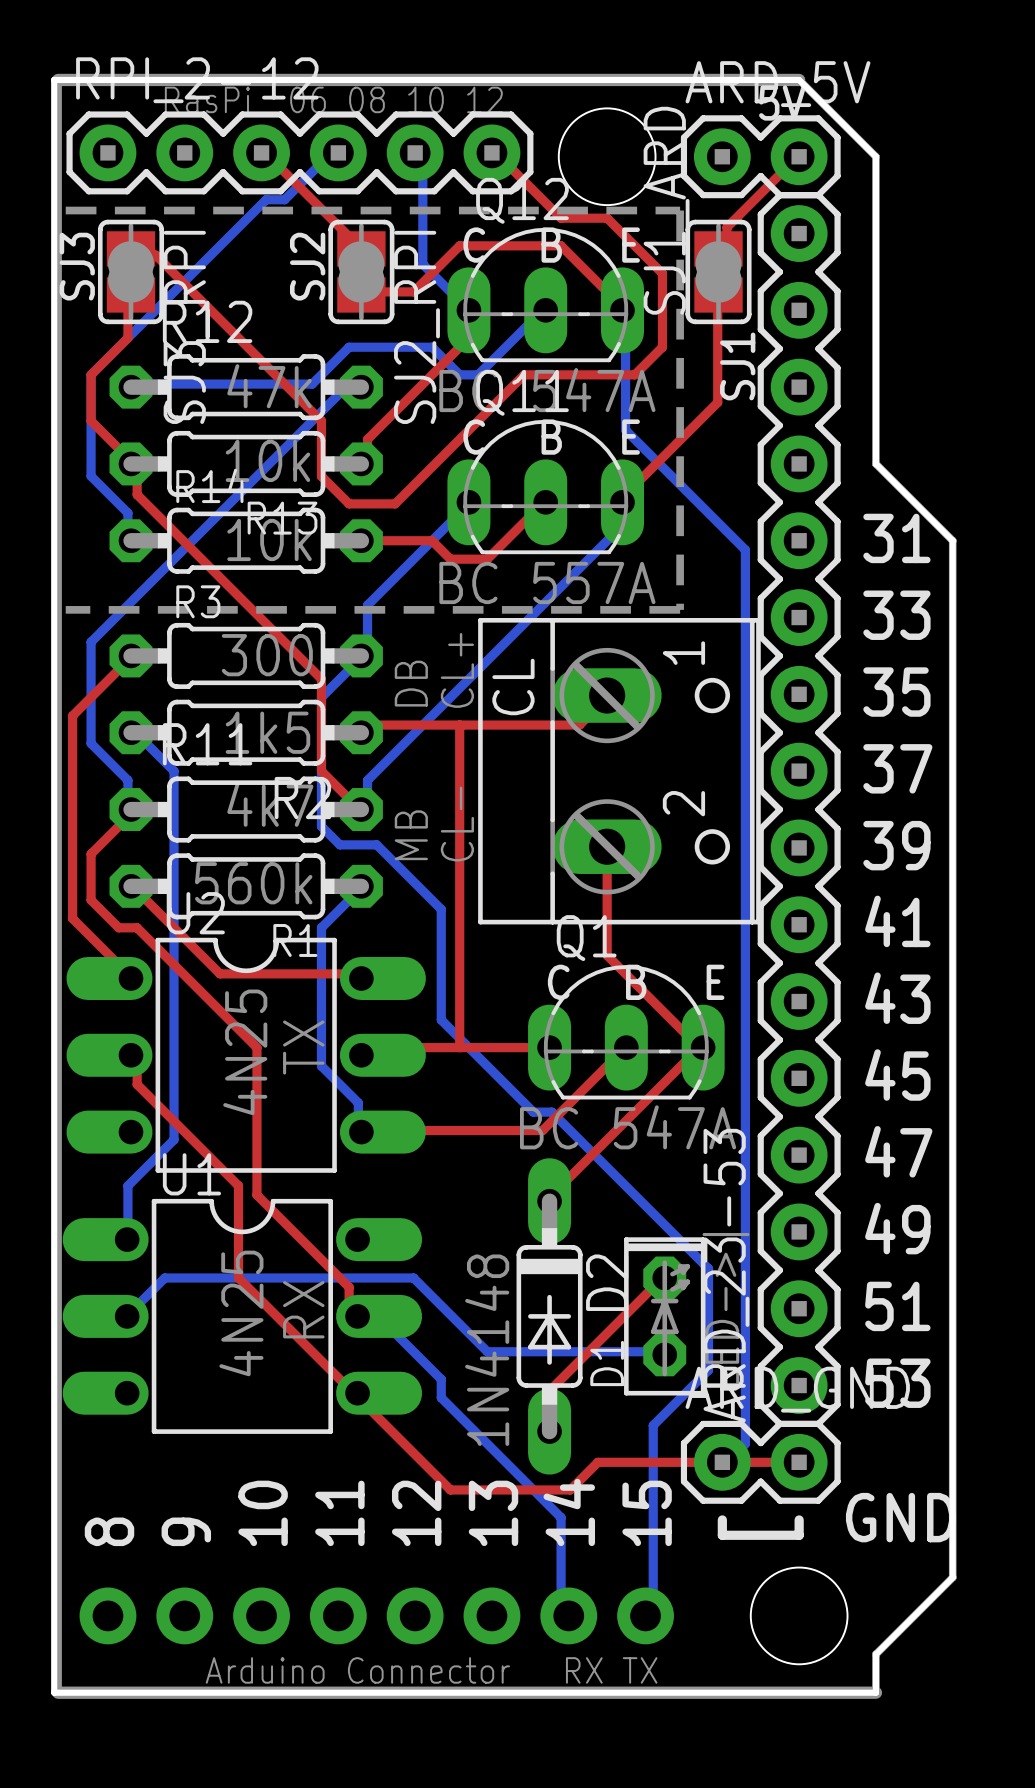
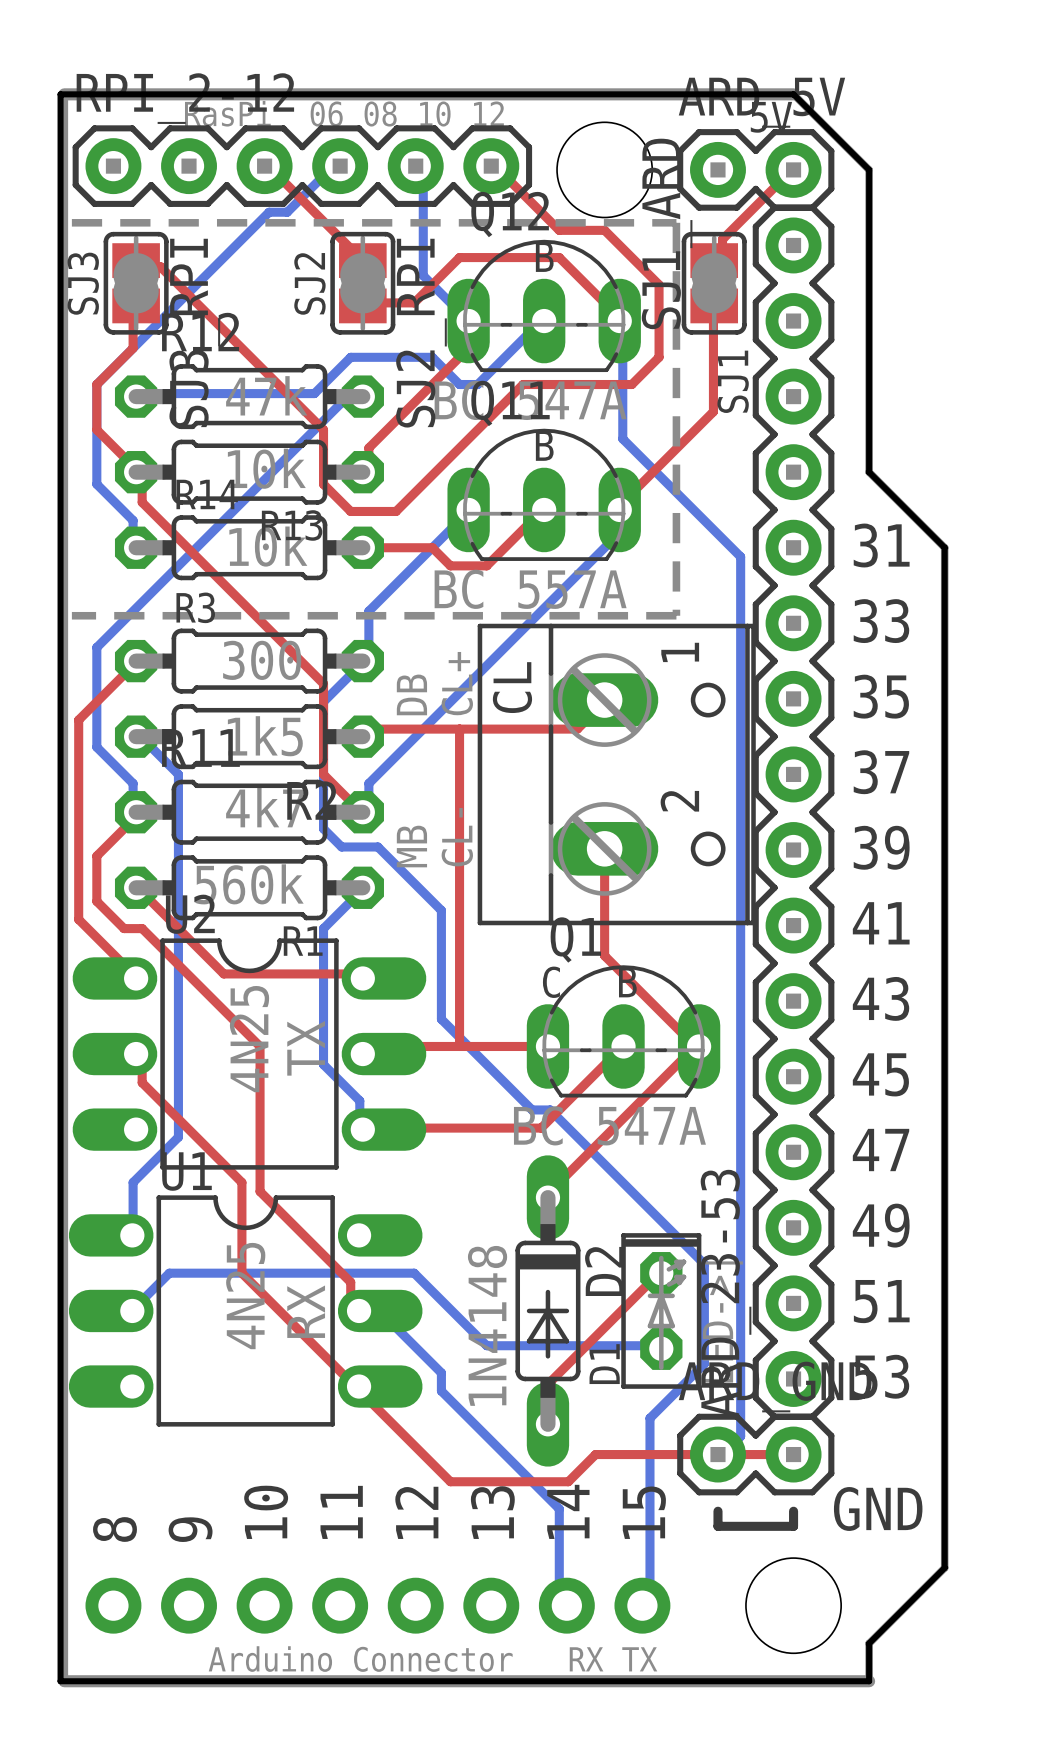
text: C (474, 245) -> none
text: E (631, 245) -> none
text: C (474, 437) -> none
text: E (631, 437) -> none
text: E (715, 982) -> none

